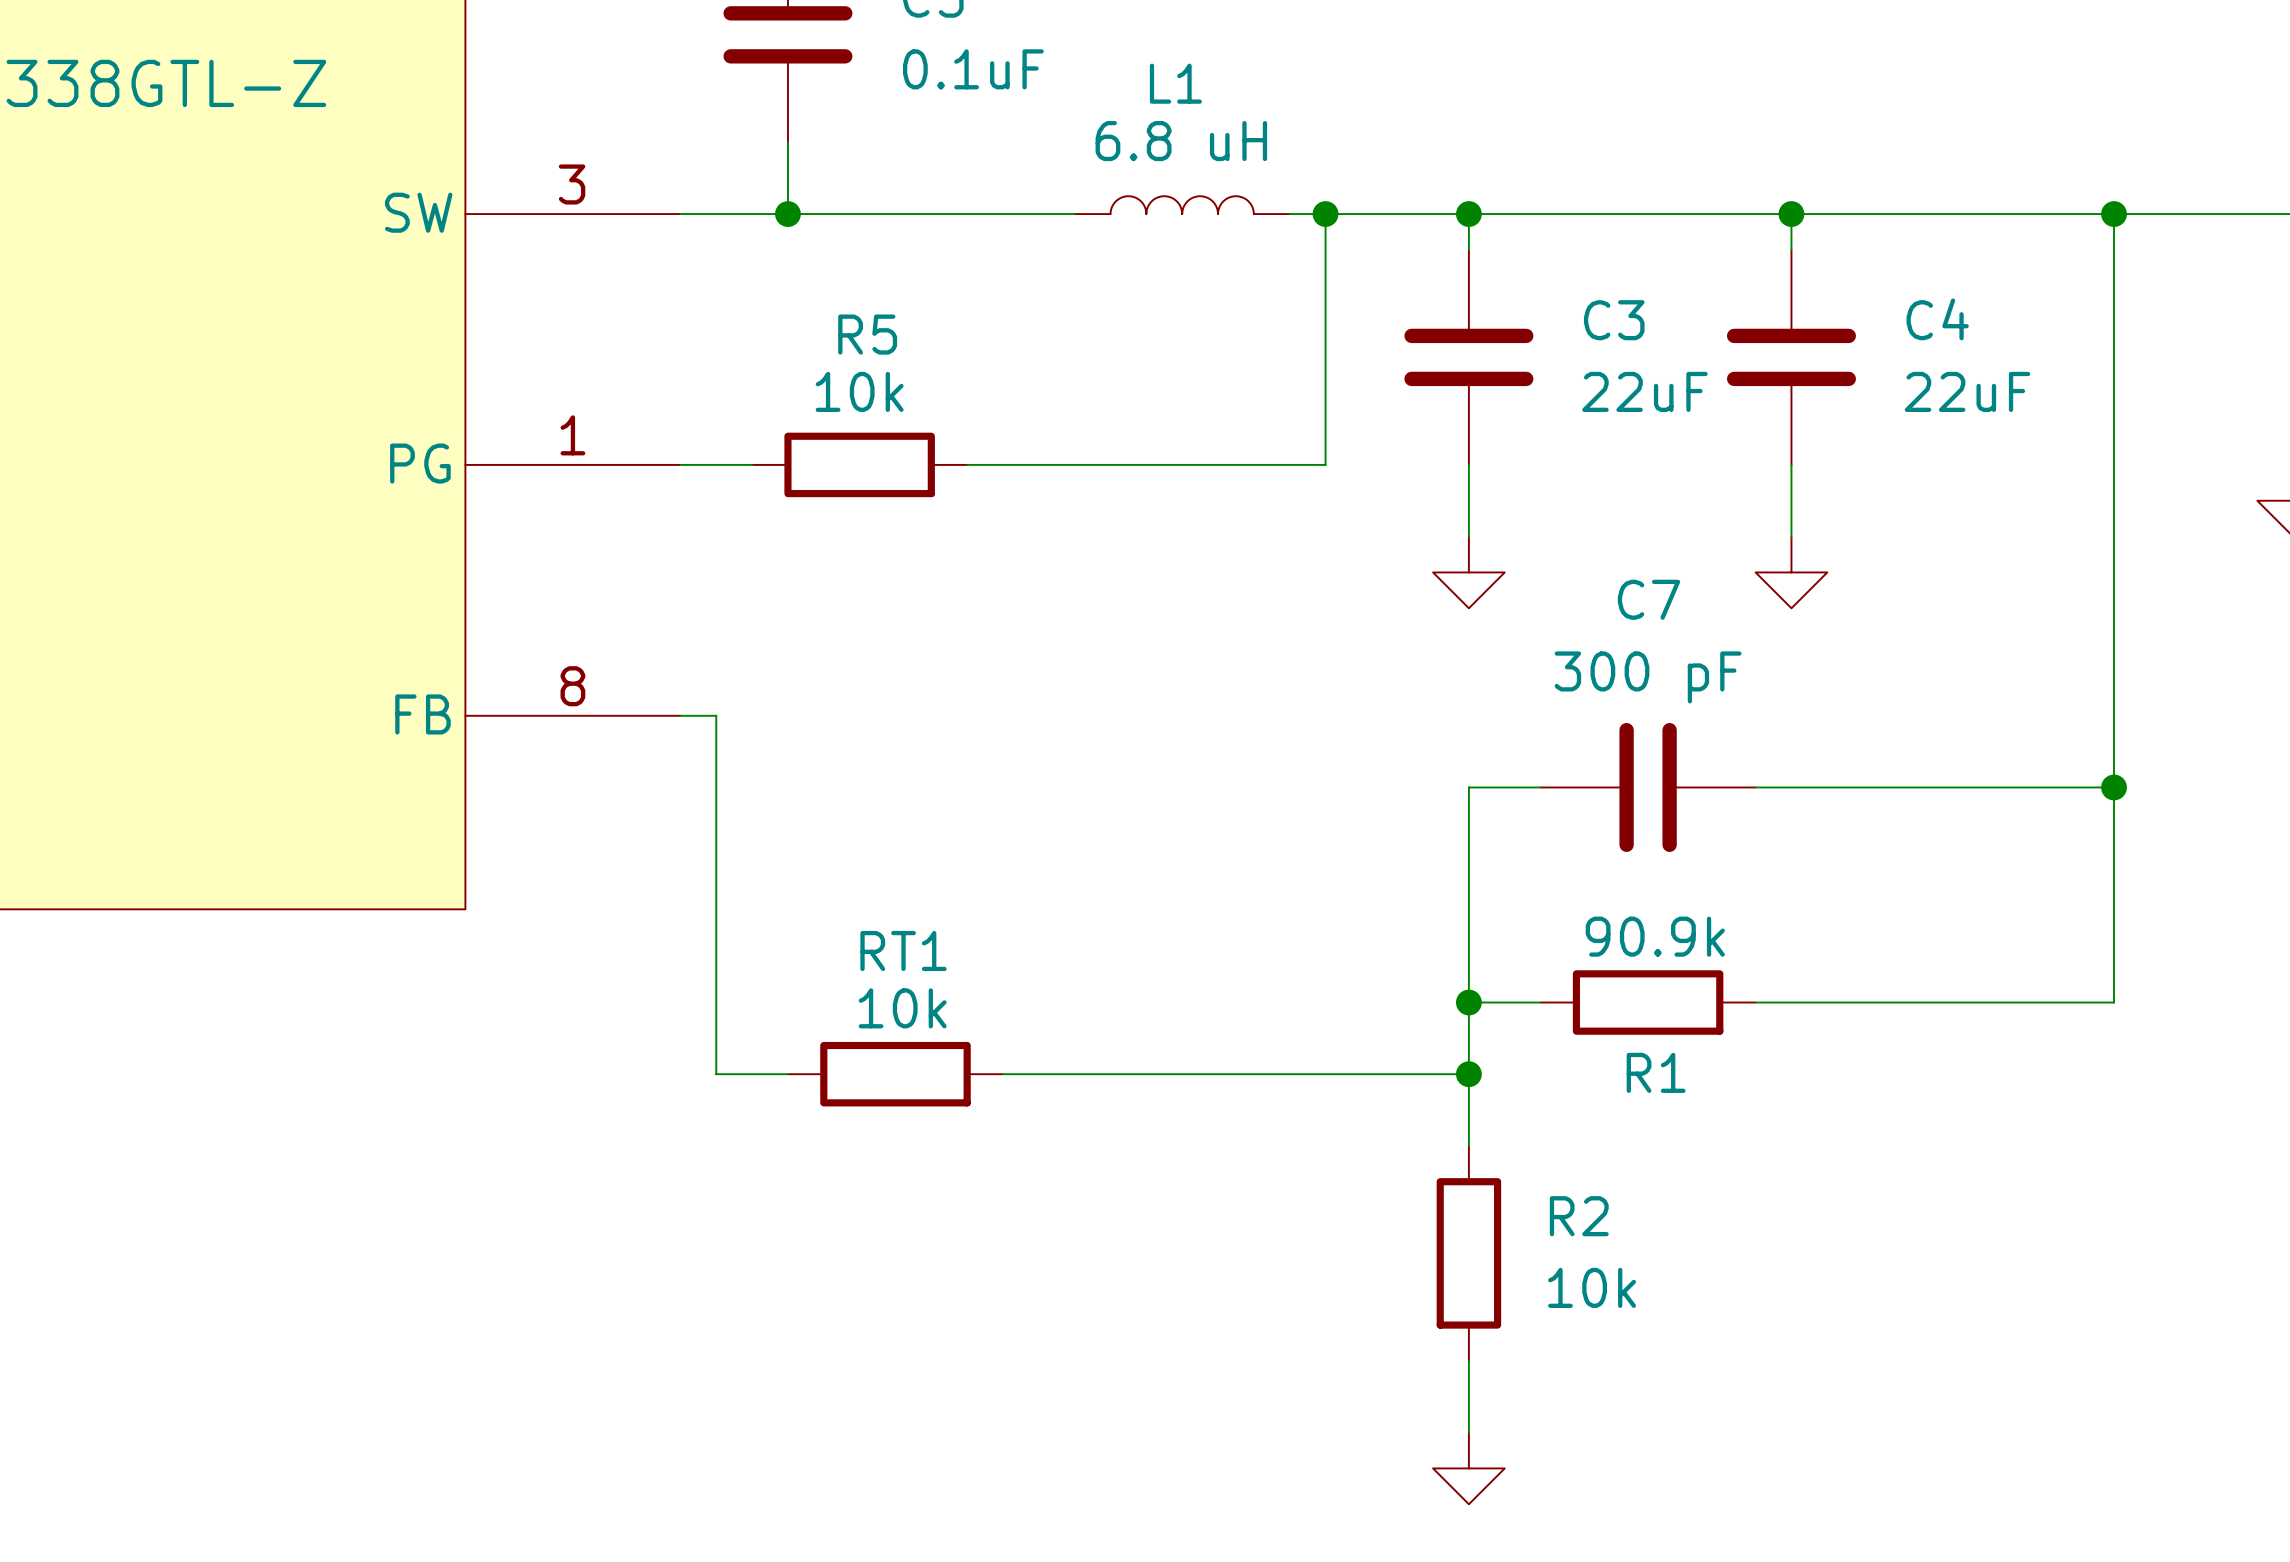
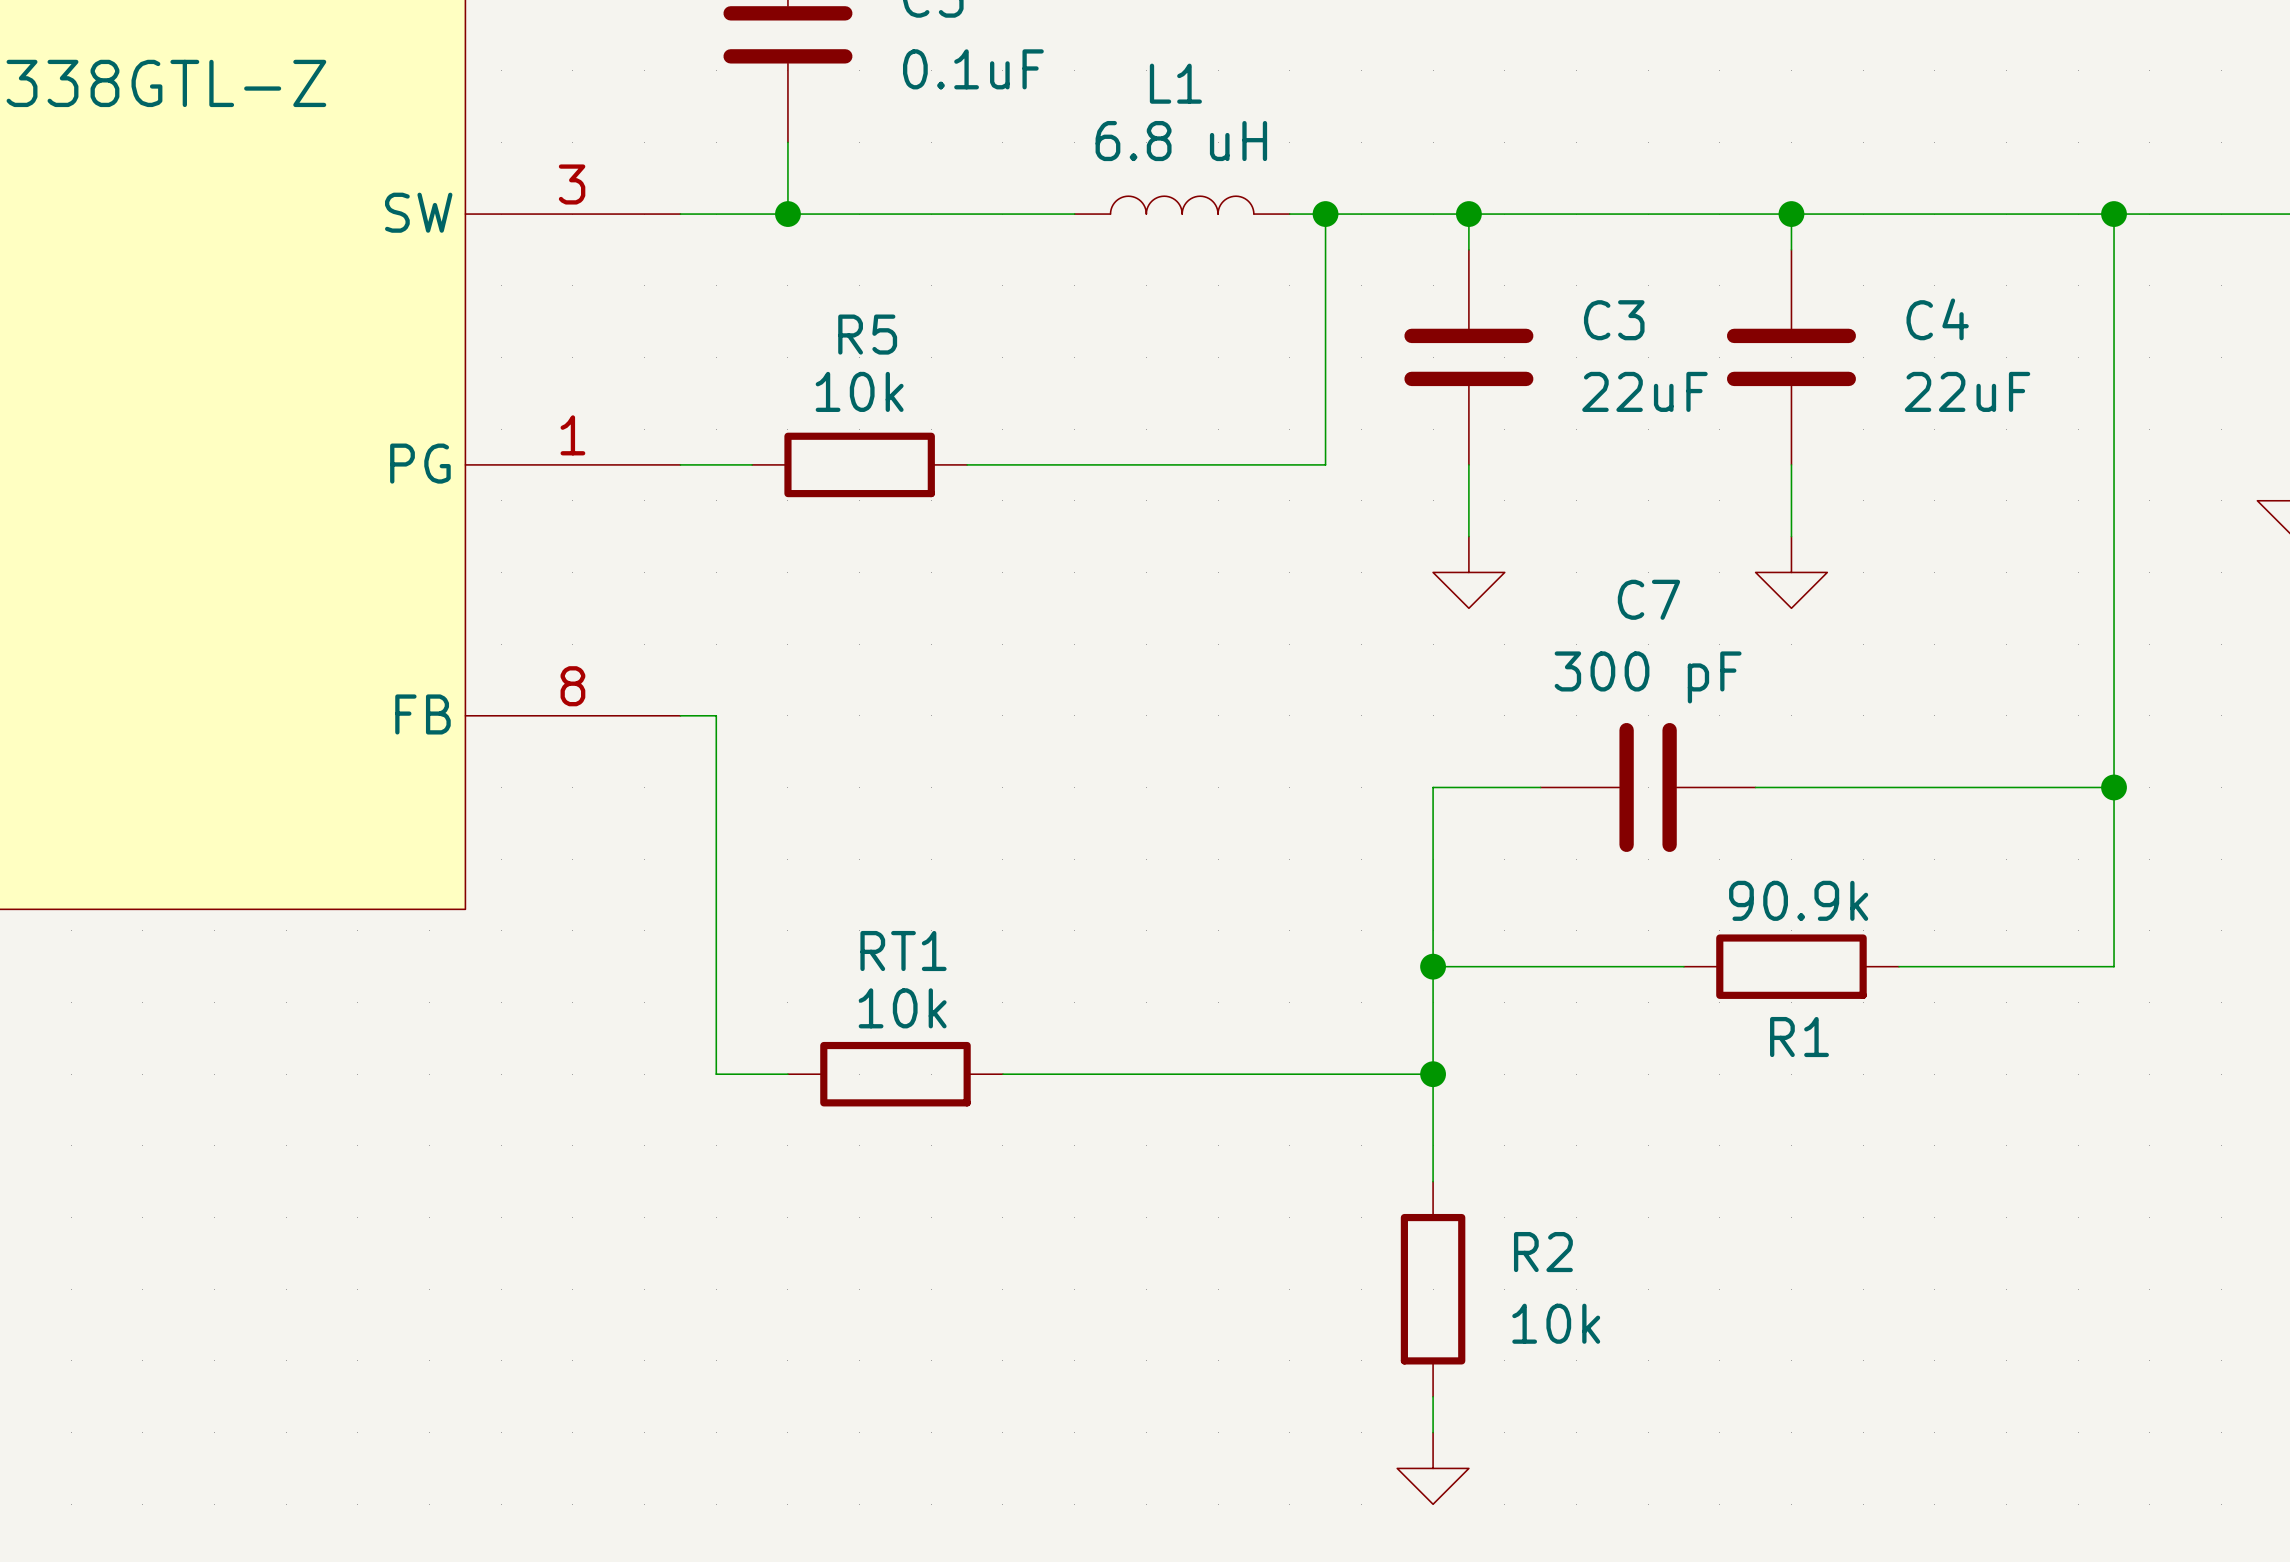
wire: (1468, 787) (1468, 1145) -> (1468, 787) (1433, 787) (1433, 1181)
wire: none -> (1433, 966) (1683, 966)
junction: none -> (1433, 966)
wire: (2114, 966) (2114, 1002) (1755, 1002) -> (2114, 966) (1898, 966)
wire: (1468, 1002) (1540, 1002) -> none
junction: (1468, 1002) -> none
R1 position: (1648, 1002) -> (1791, 966)
wire: (1433, 1074) (1468, 1074) -> none
junction position: (1468, 1074) -> (1433, 1074)
R2 position: (1468, 1253) -> (1433, 1289)
wire: (1468, 1360) (1468, 1432) -> none
wire: none -> (1433, 1396) (1433, 1432)
power symbol position: (1468, 1468) -> (1433, 1468)

